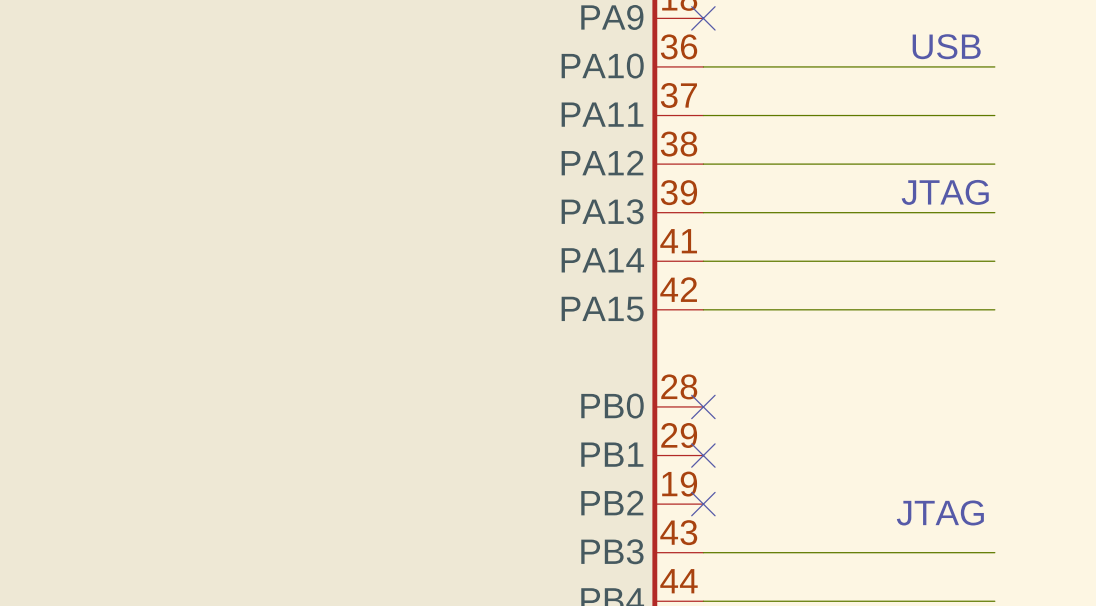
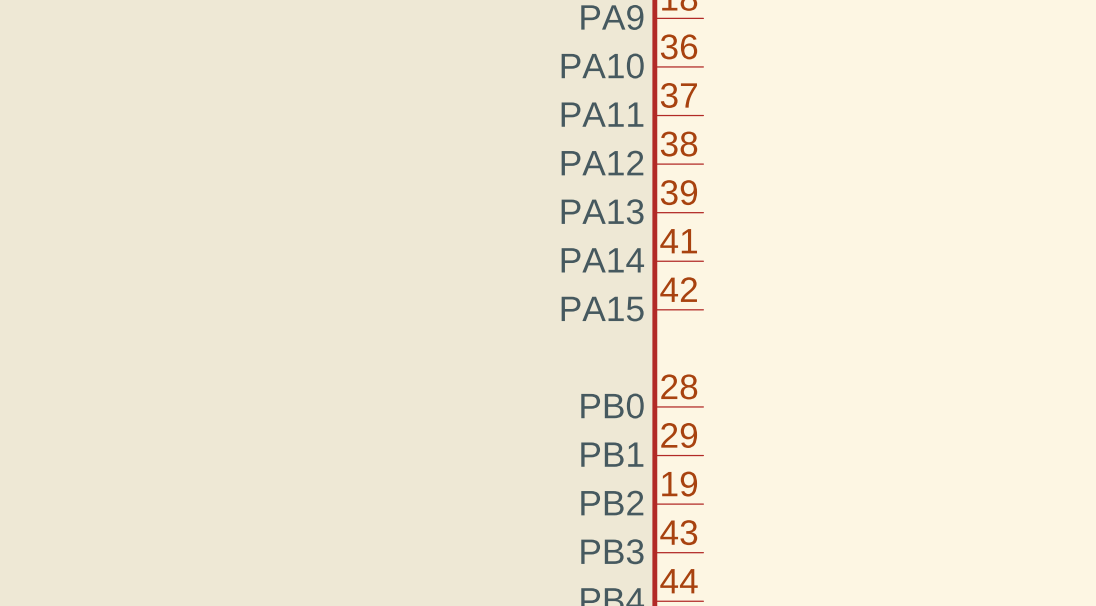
no-connect mark: (703, 18) -> none
text: USB (946, 46) -> none
wire: (703, 66) (994, 66) -> none
wire: (703, 115) (994, 115) -> none
wire: (703, 164) (994, 164) -> none
text: JTAG (945, 192) -> none
wire: (703, 212) (994, 212) -> none
wire: (703, 261) (994, 261) -> none
wire: (703, 309) (994, 309) -> none
no-connect mark: (703, 406) -> none
no-connect mark: (703, 455) -> none
no-connect mark: (703, 504) -> none
text: JTAG (940, 512) -> none
wire: (703, 552) (994, 552) -> none
wire: (703, 601) (994, 601) -> none

